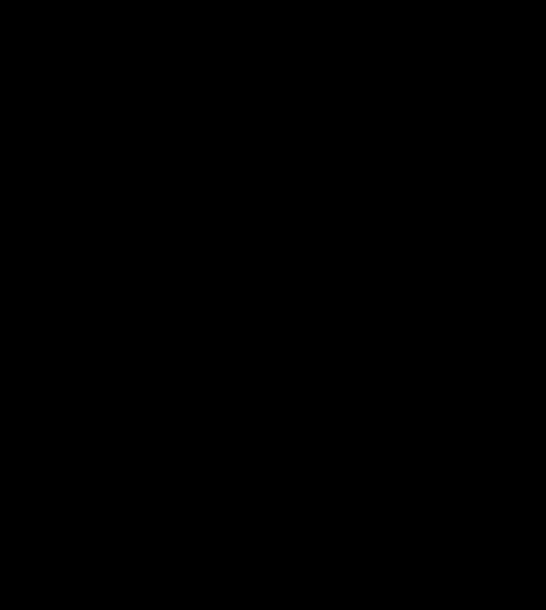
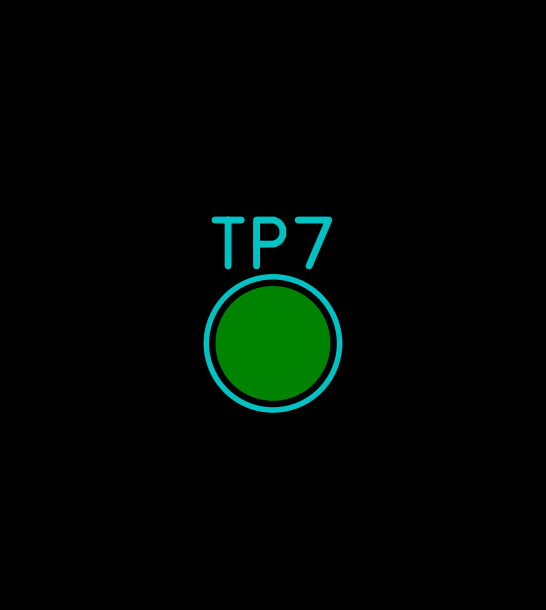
TP7: none -> (272, 343)

